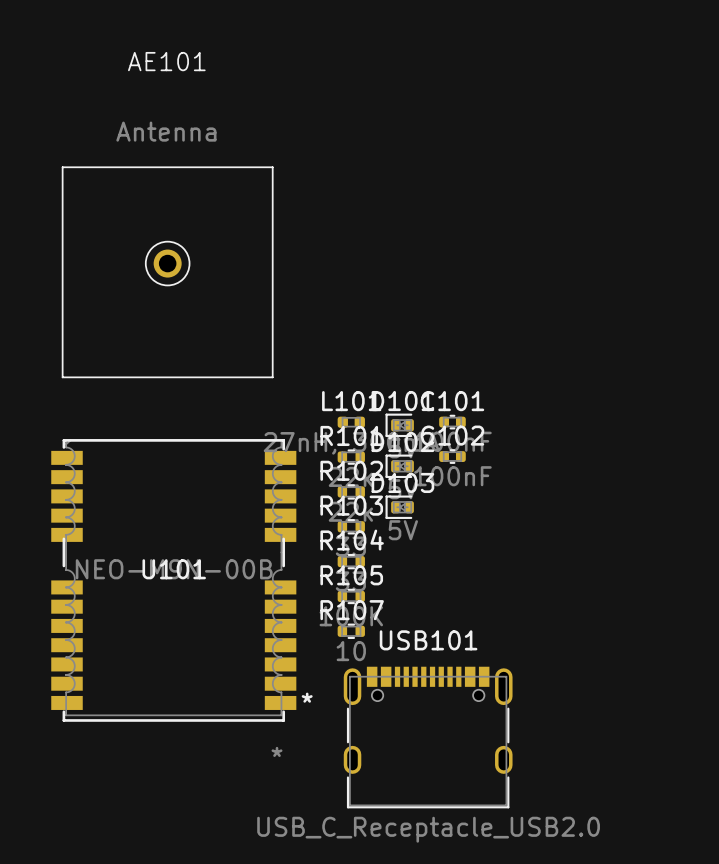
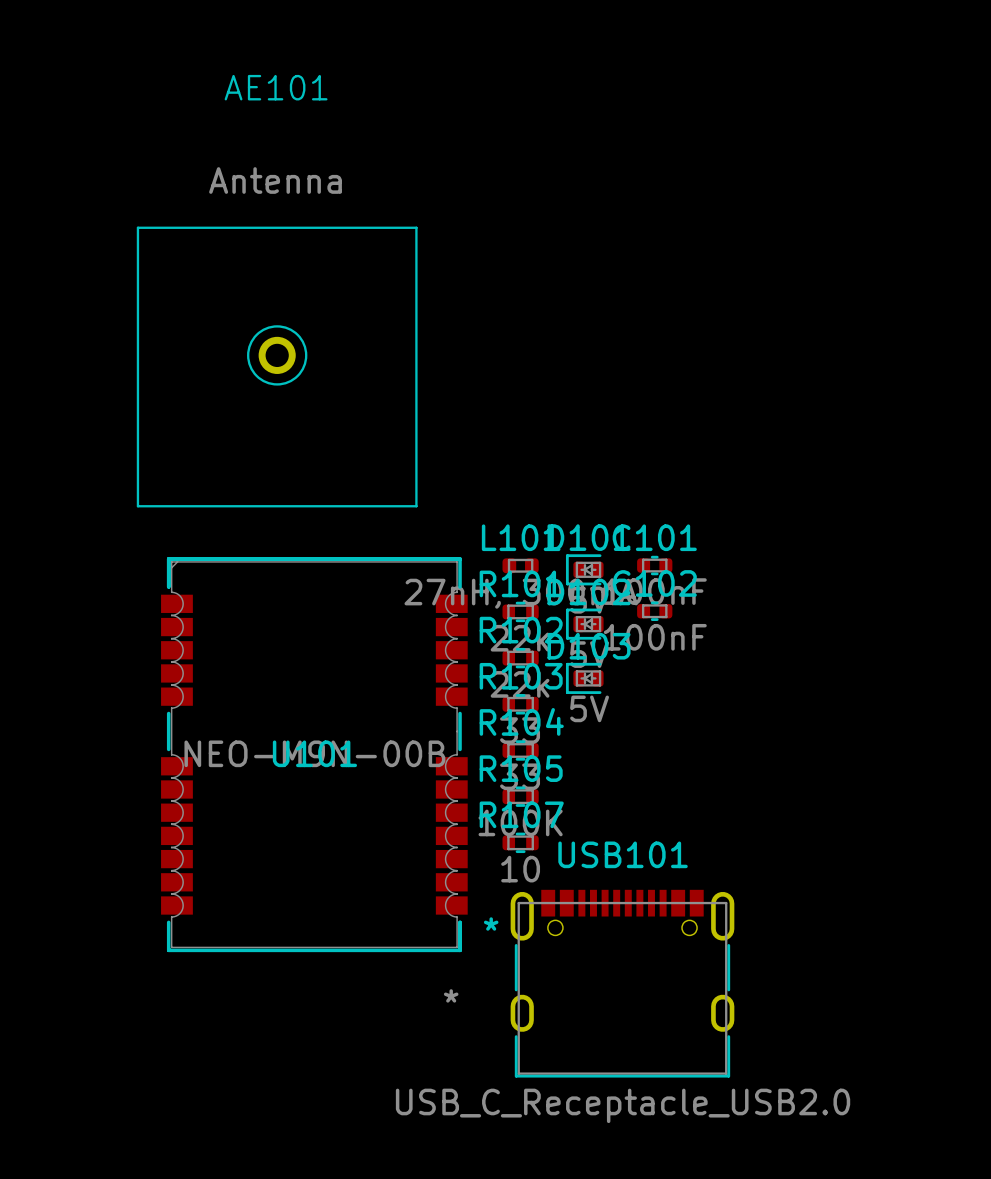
U101 footprint: [51, 439, 297, 722] -> [161, 557, 468, 953]

